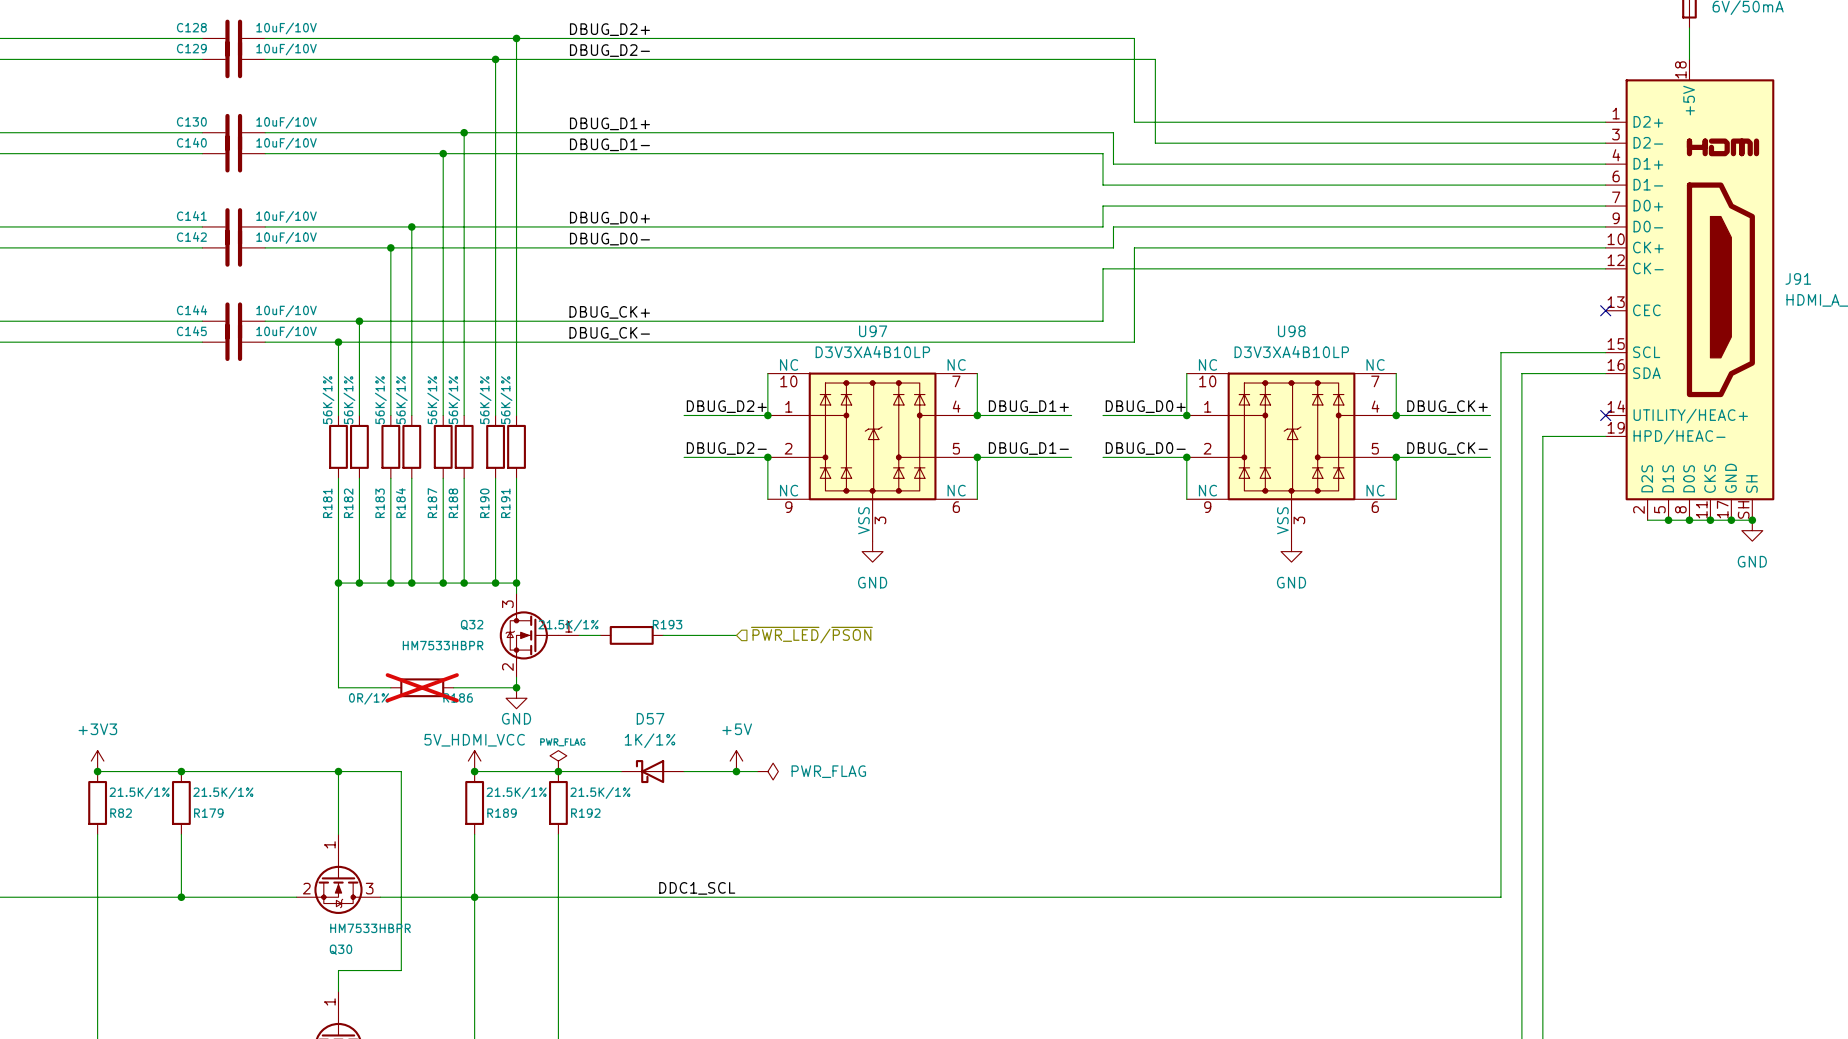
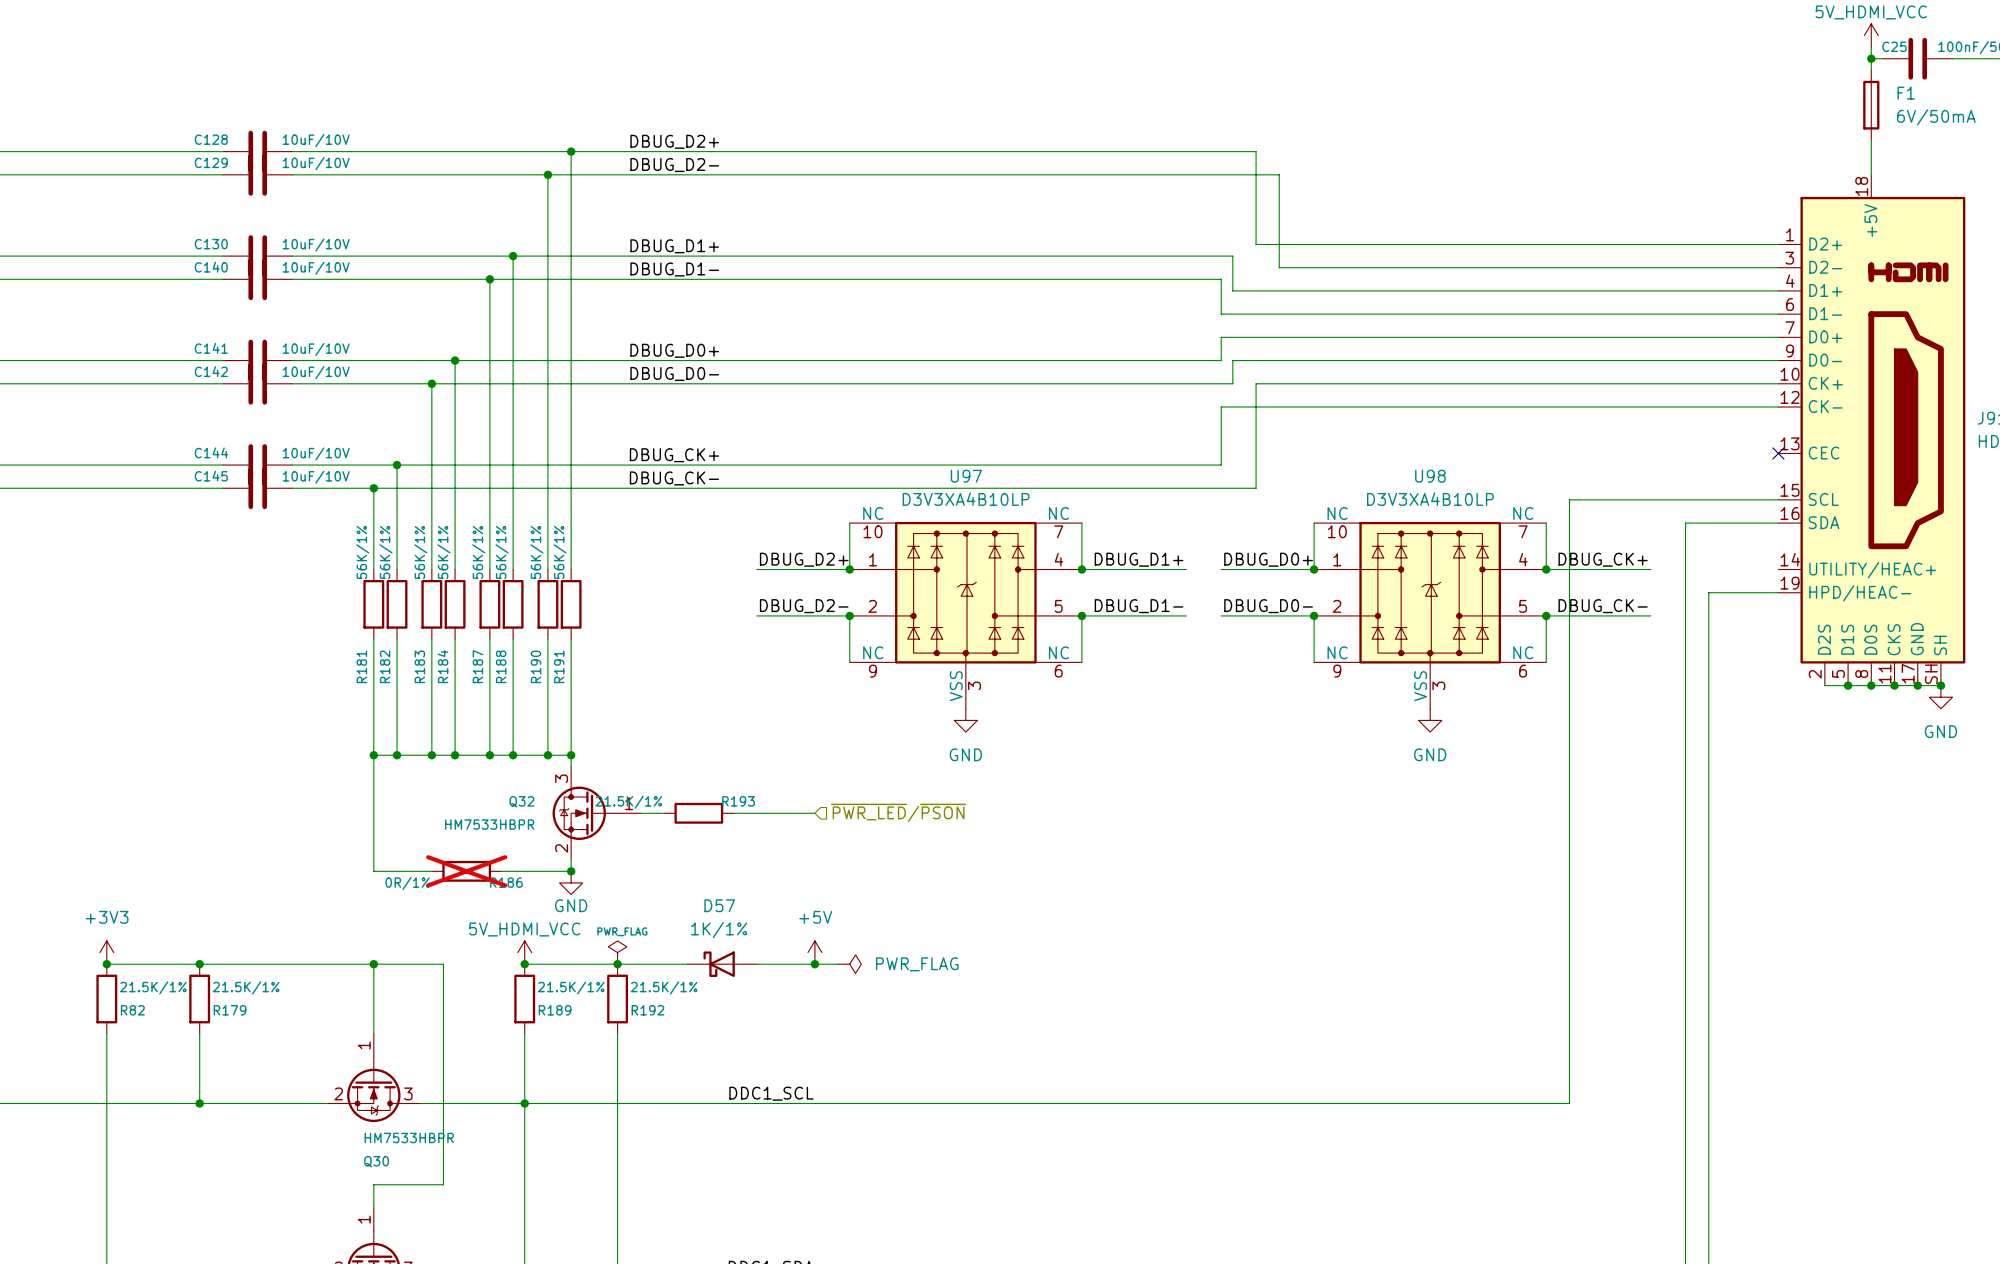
wire: (1500, 352) (1500, 897) (1417, 897) -> (1662, 499) (1569, 499) (1569, 1103)
no-connect mark: (1605, 415) -> none

